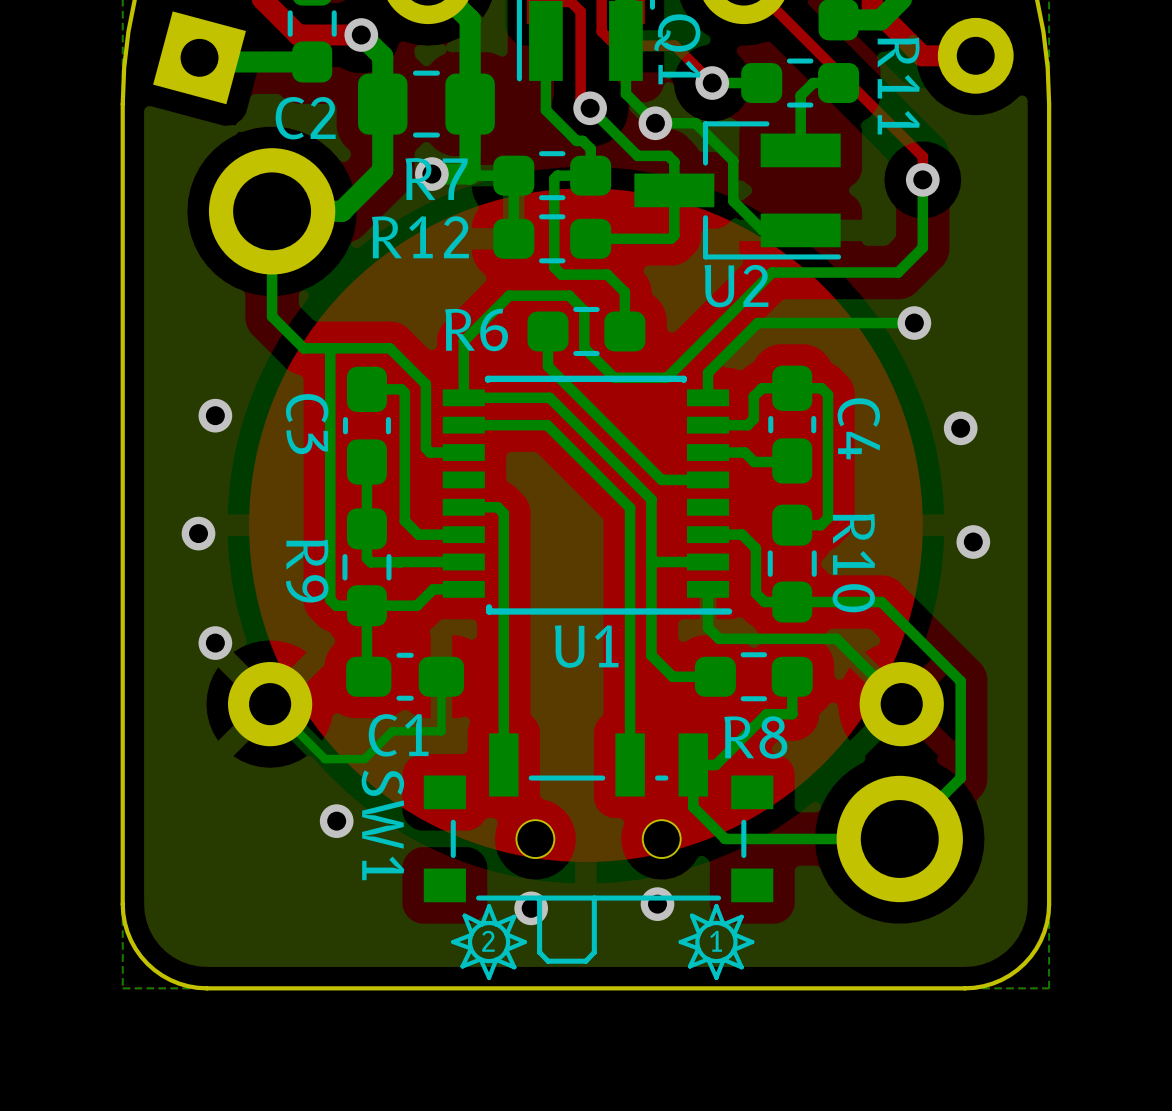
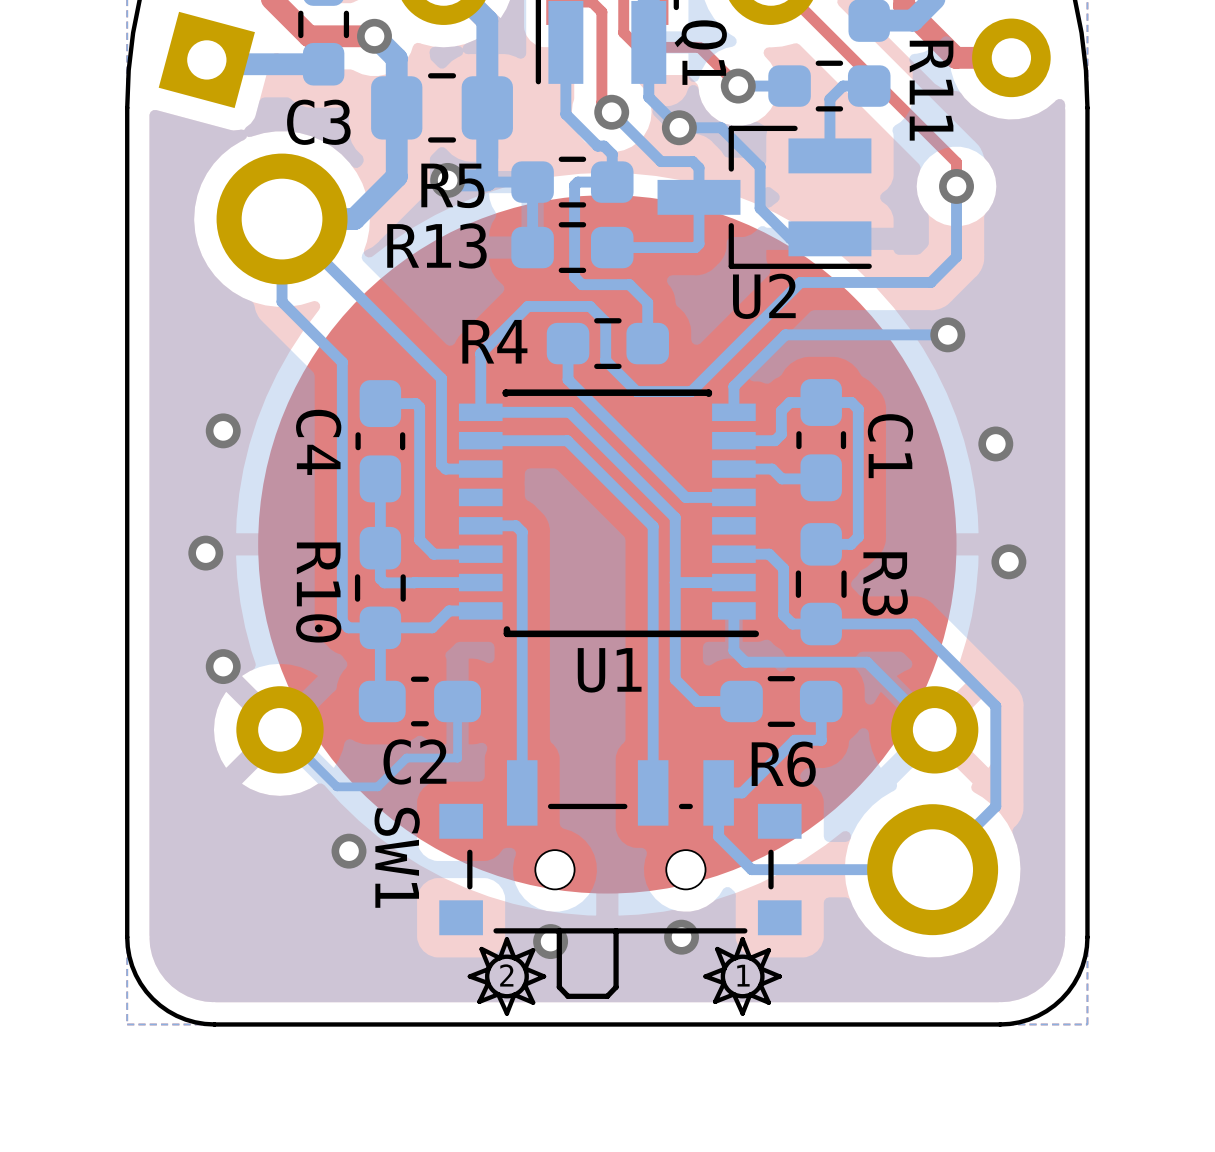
C2 name: C2 (305, 118) -> C3 (318, 122)
R7 name: R7 (436, 179) -> R5 (452, 185)
R12 name: R12 (420, 237) -> R13 (436, 245)
bottom track: (272, 291) (272, 316) (303, 348) (389, 348) (425, 384) -> (282, 219) (441, 378) (441, 398)
R6 name: R6 (476, 329) -> R4 (494, 341)
C3 name: C3 (307, 424) -> C4 (318, 442)
C4 name: C4 (858, 428) -> C1 (890, 446)
R10 name: R10 (853, 563) -> R3 (885, 584)
R9 name: R9 (307, 571) -> R10 (318, 592)
C1 name: C1 (398, 735) -> C2 (415, 761)
R8 name: R8 (755, 737) -> R6 (783, 764)

